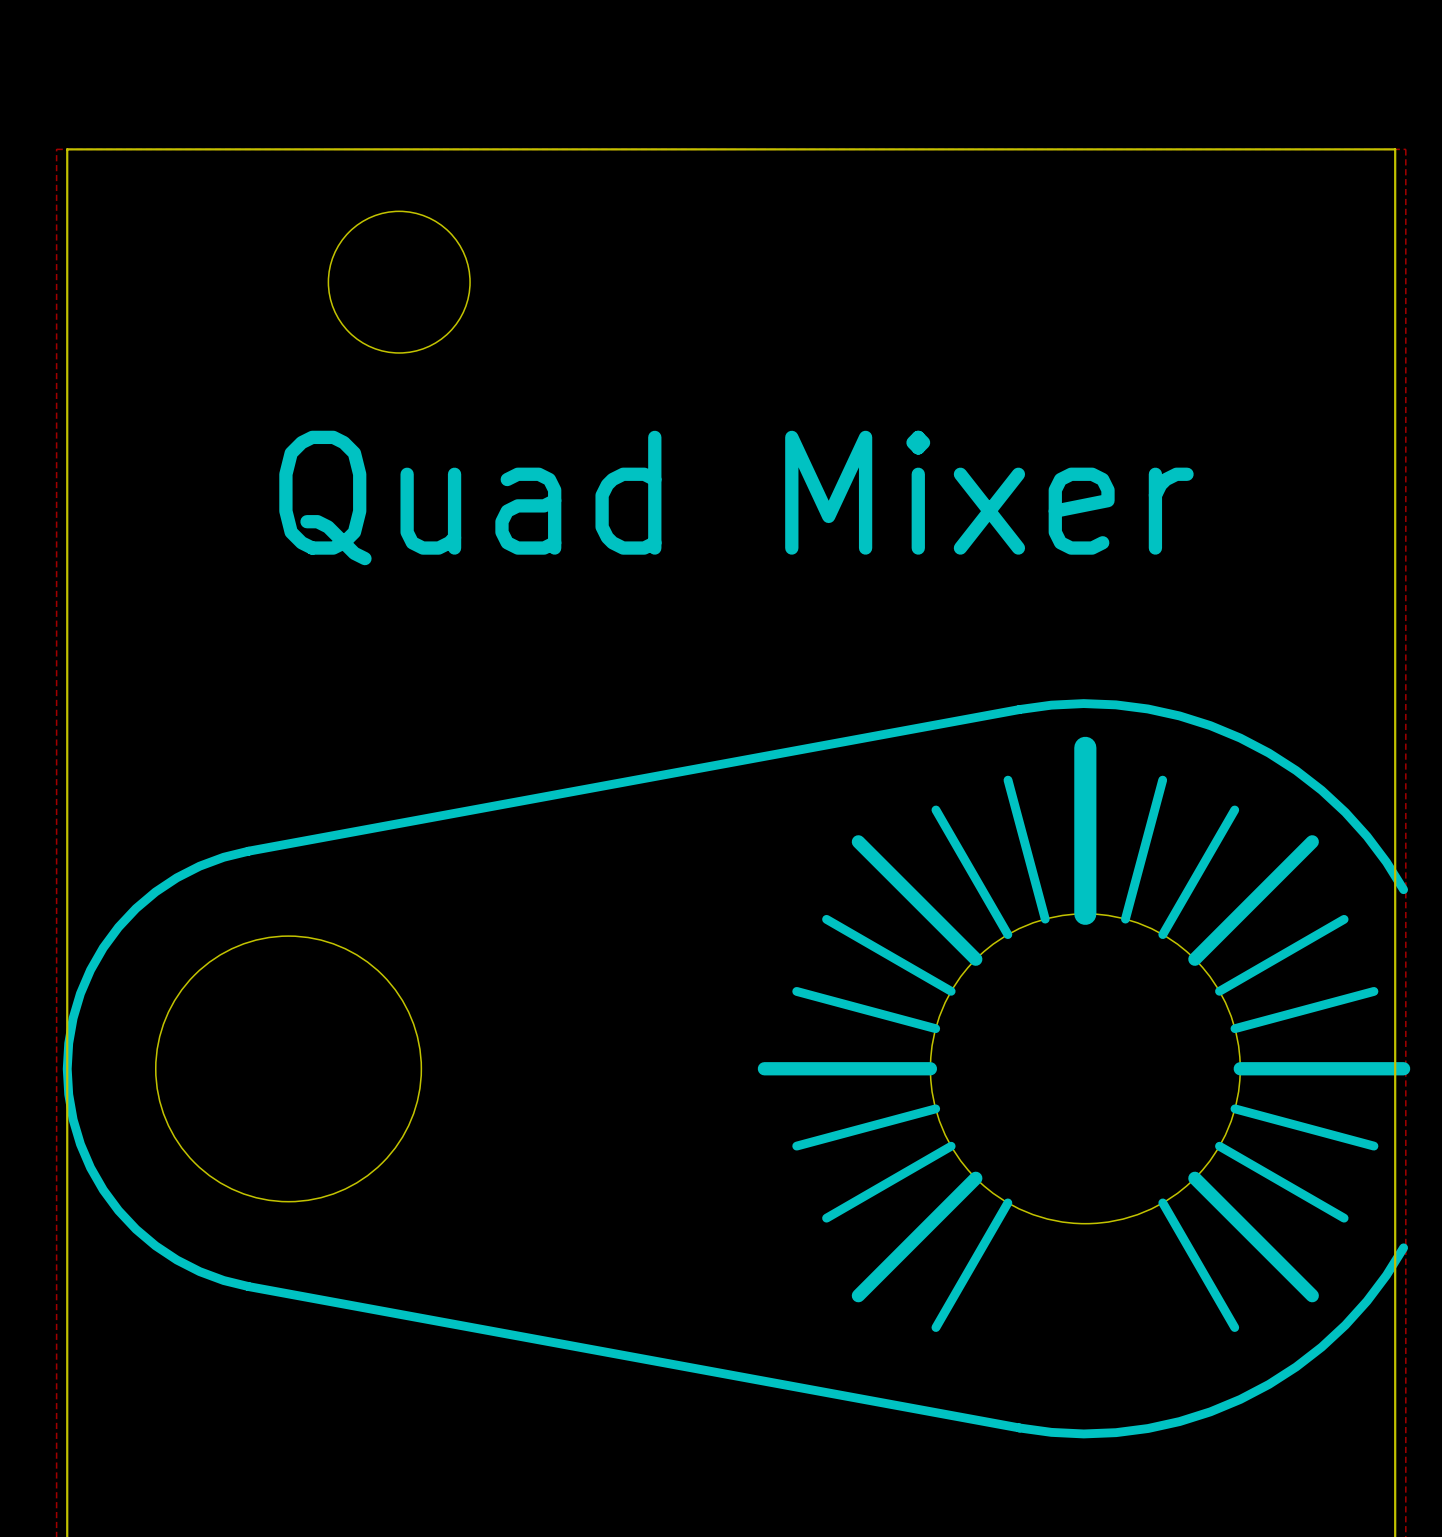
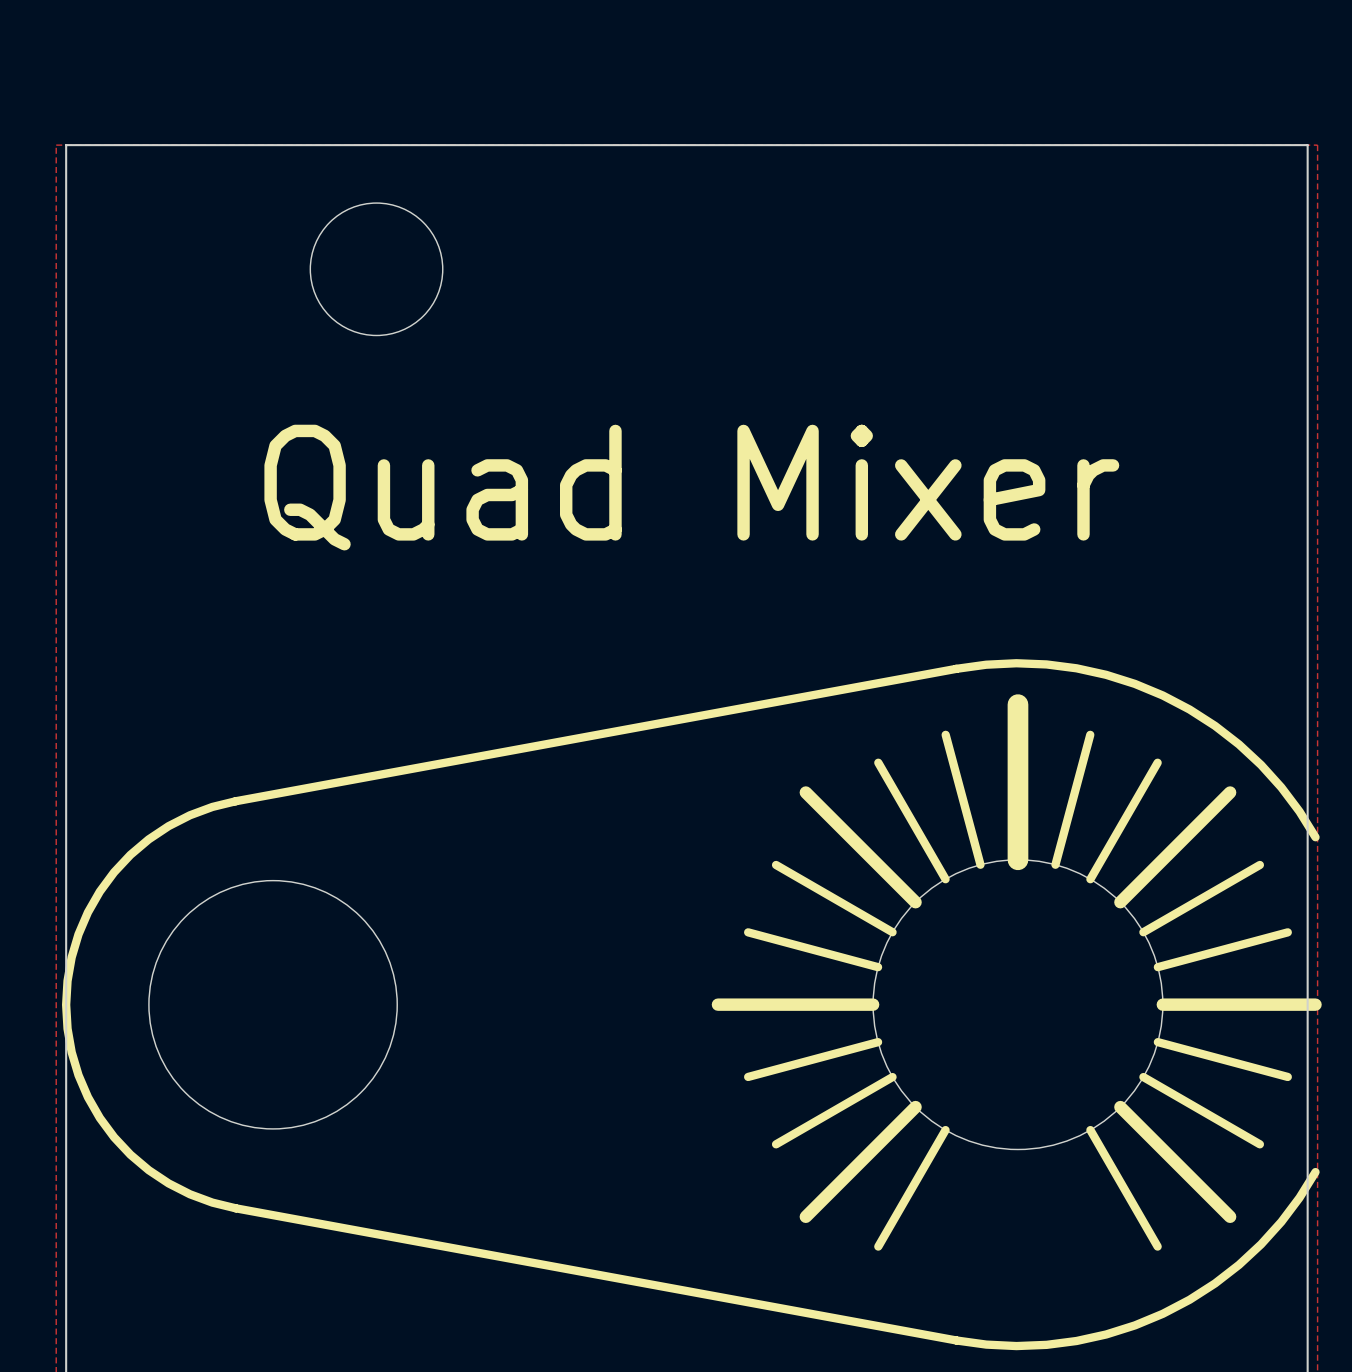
text position: Quad Mixer (736, 497) -> Quad Mixer (691, 487)

